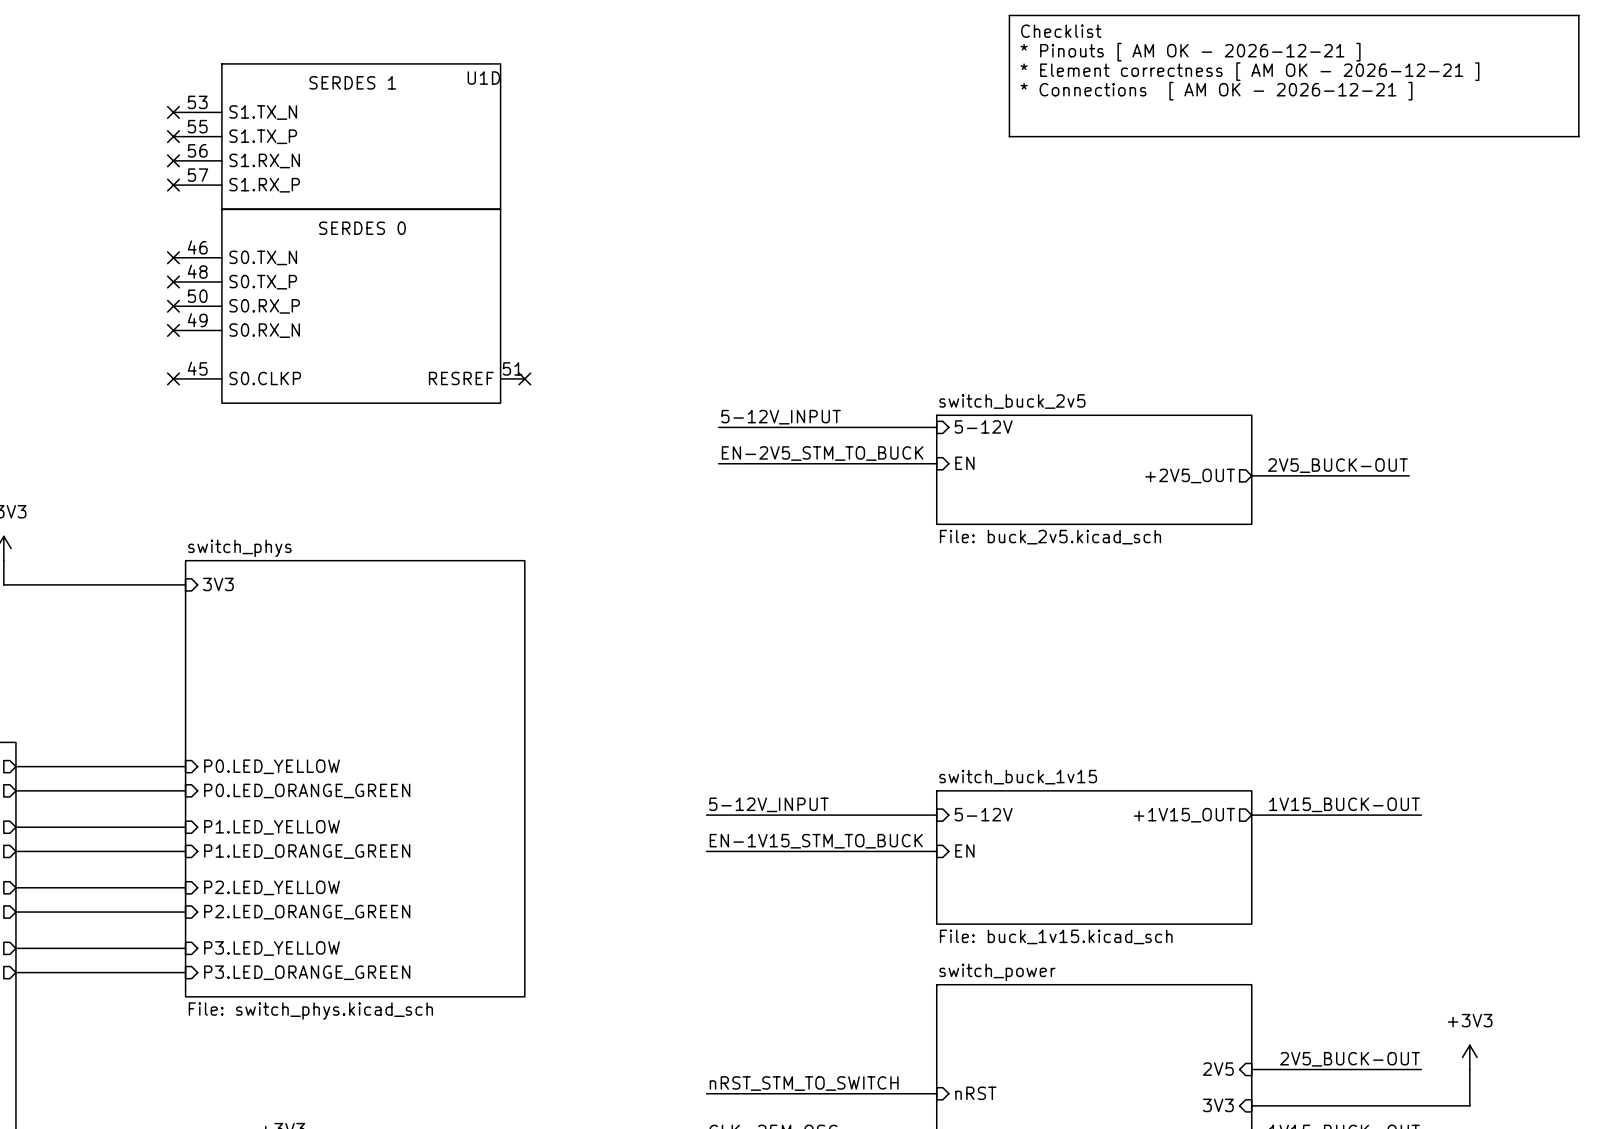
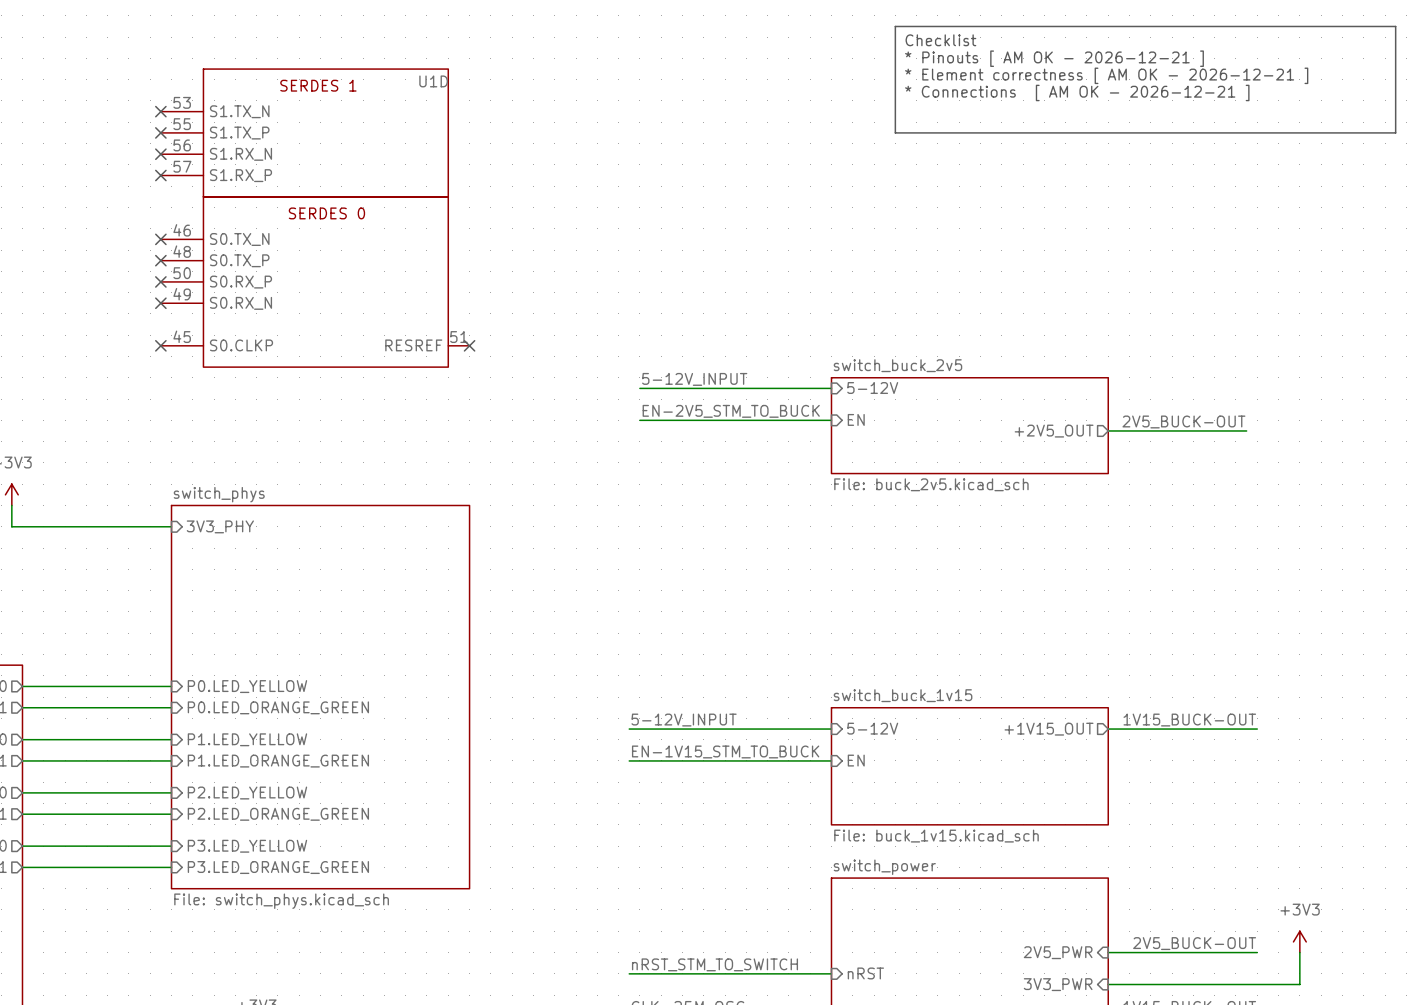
sheet pin: 3V3 (218, 584) -> 3V3_PHY (220, 526)
sheet pin: 2V5 (1218, 1069) -> 2V5_PWR (1058, 952)
sheet pin: 3V3 (1218, 1105) -> 3V3_PWR (1058, 984)

